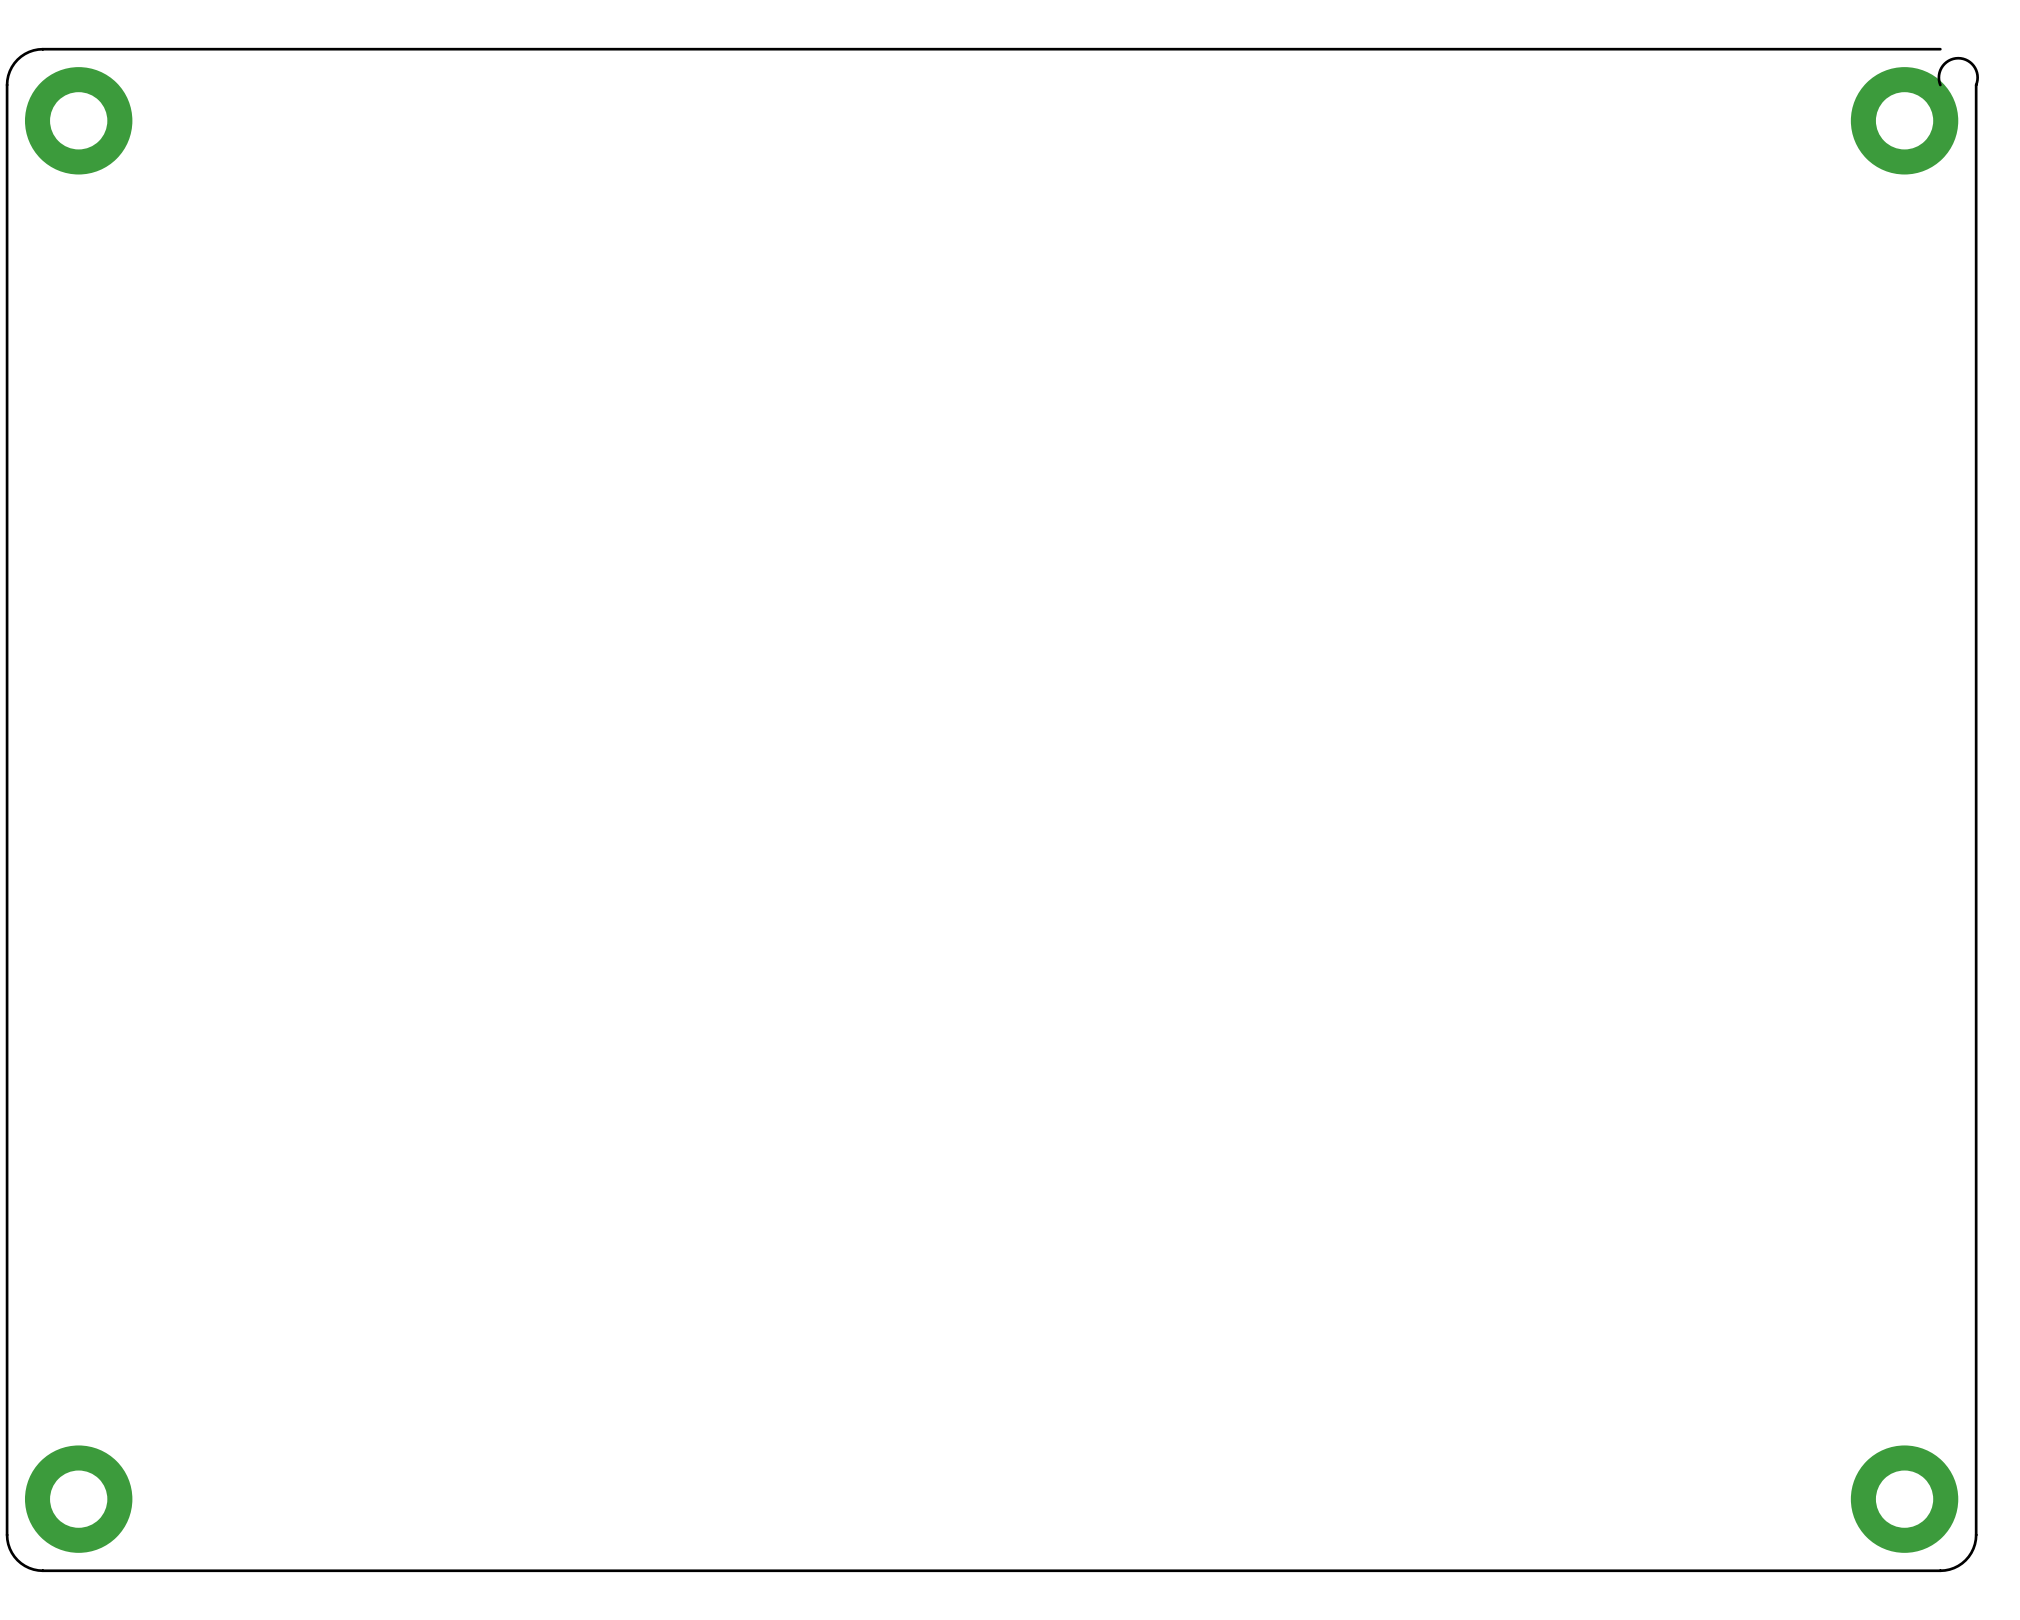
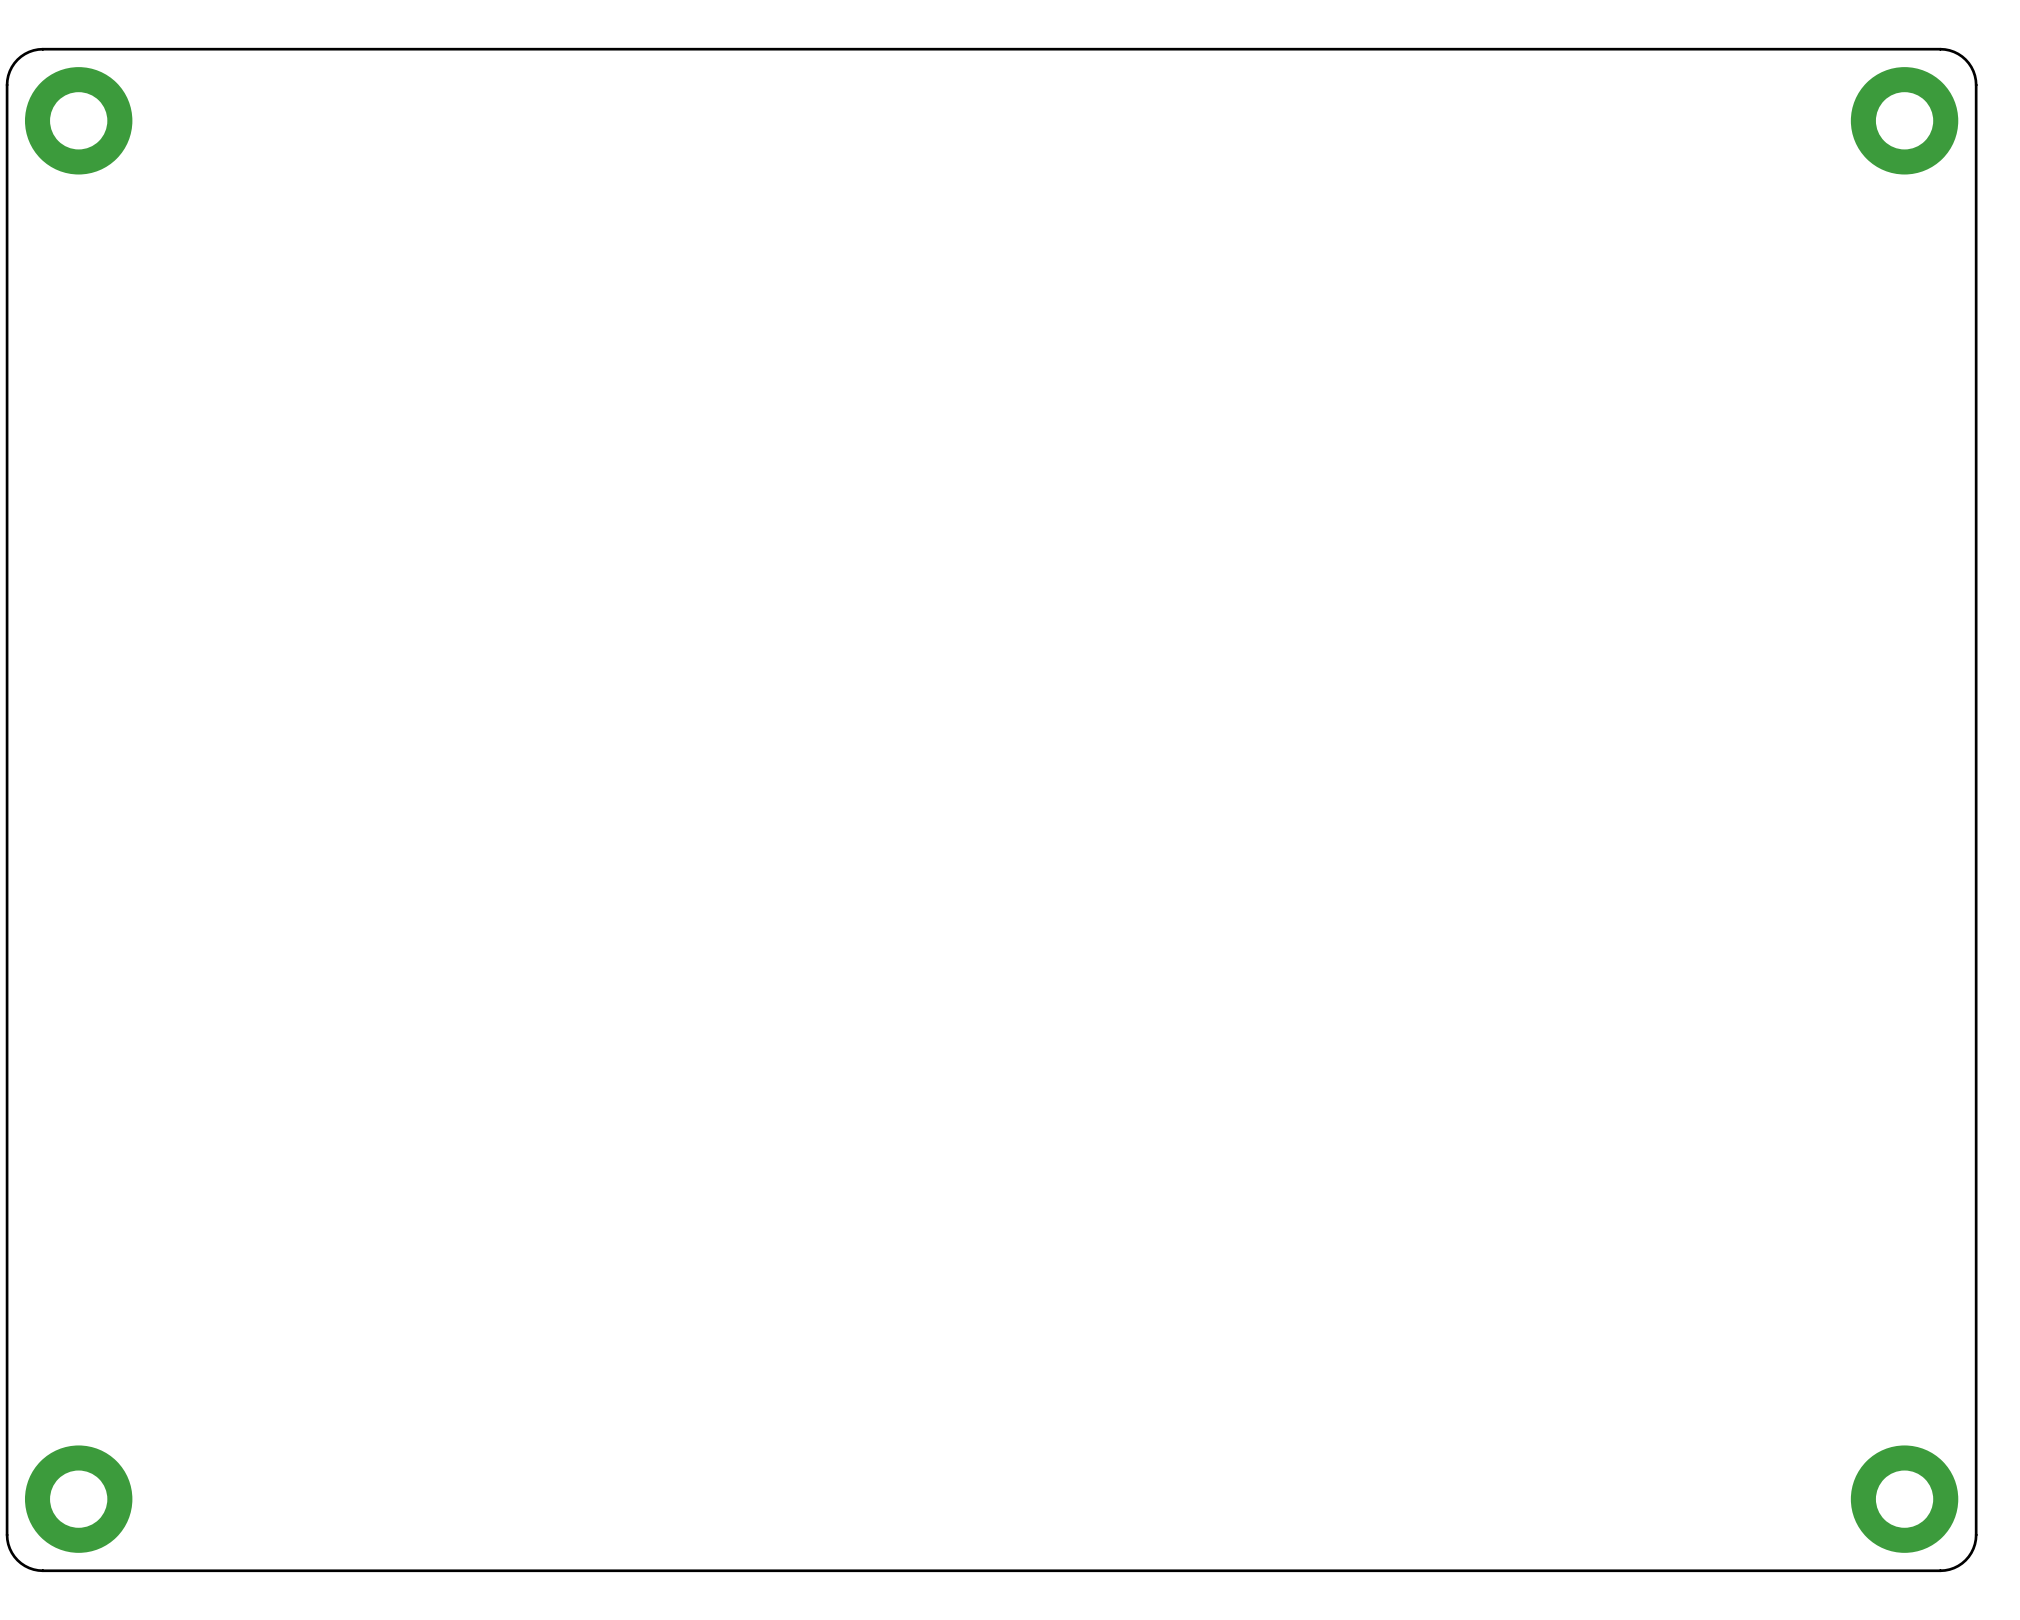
board edge: (1976, 85) (1977, 75) (1973, 65) (1967, 60) (1958, 58) (1950, 59) (1942, 65) (1939, 75) (1940, 85) -> (1976, 85) (1973, 71) (1965, 59) (1954, 51) (1940, 49)

